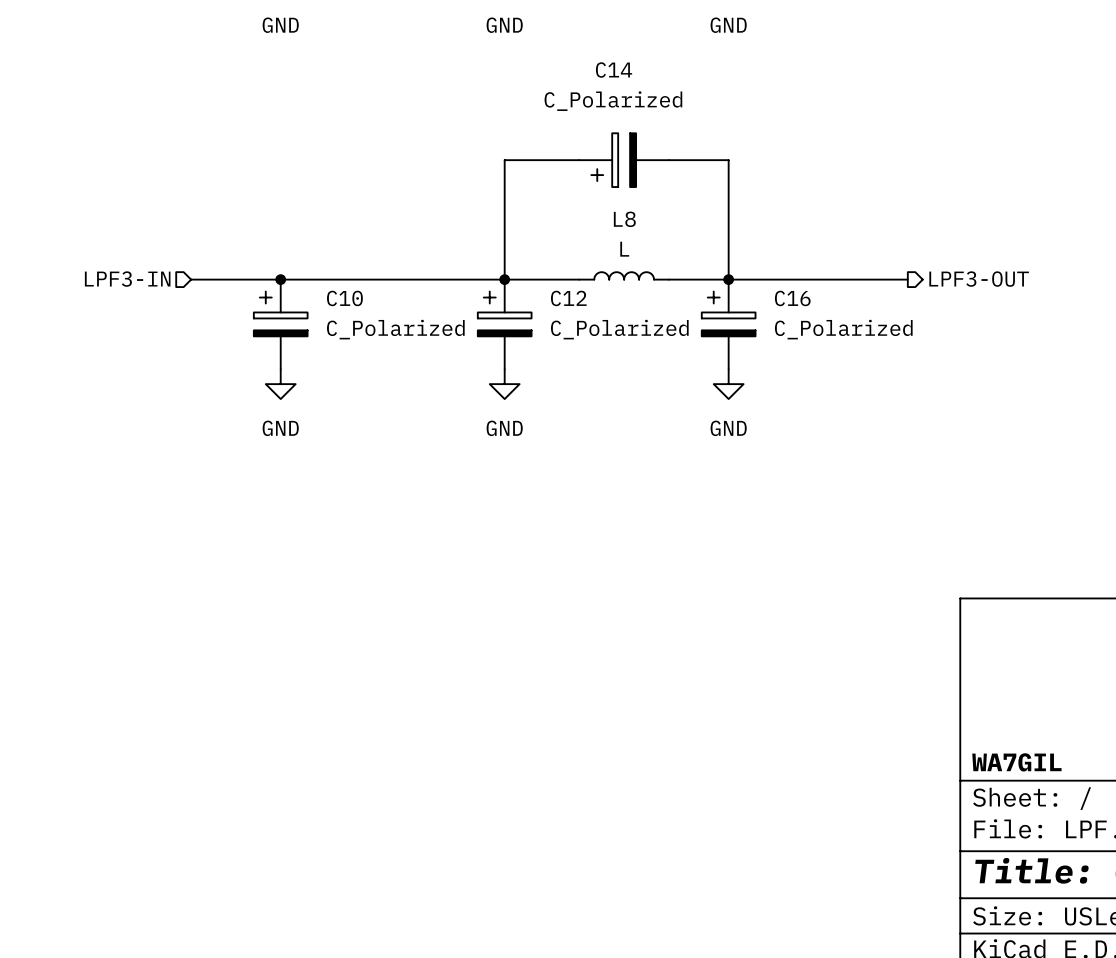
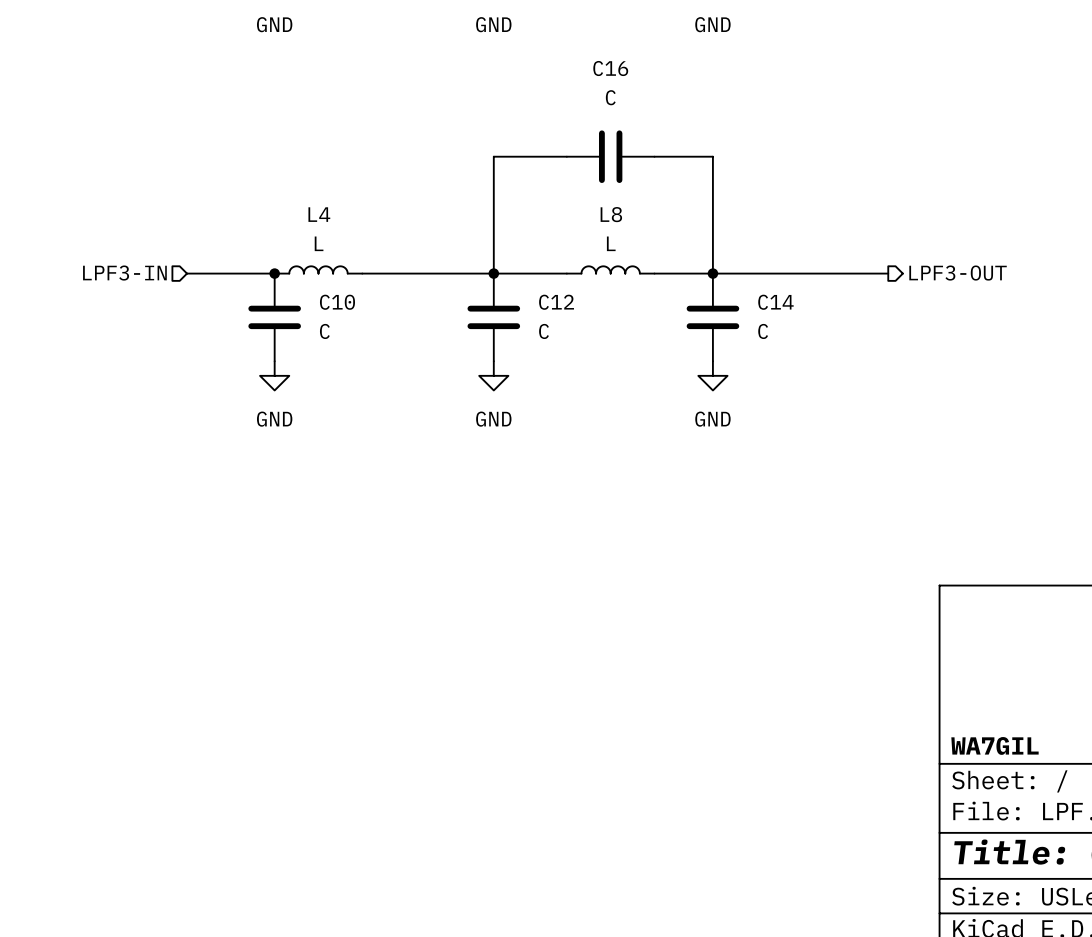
C14 name position: C14 (614, 70) -> C14 (775, 302)
C14 value: C_Polarized (613, 101) -> C (763, 331)
C14 symbol: [579, 133, 669, 188] -> [686, 273, 740, 362]
L4: none -> L (318, 269)
C10 symbol: [253, 279, 308, 370] -> [248, 273, 301, 362]
wire: (280, 279) (370, 279) -> none
C12 symbol: [477, 279, 532, 370] -> [467, 273, 521, 362]
C16 symbol: [701, 279, 756, 370] -> [566, 130, 655, 184]
C16 name position: C16 (792, 298) -> C16 (610, 68)
C10 value: C_Polarized (395, 329) -> C (324, 331)
C12 value: C_Polarized (619, 329) -> C (544, 331)
C16 value: C_Polarized (843, 329) -> C (610, 97)

